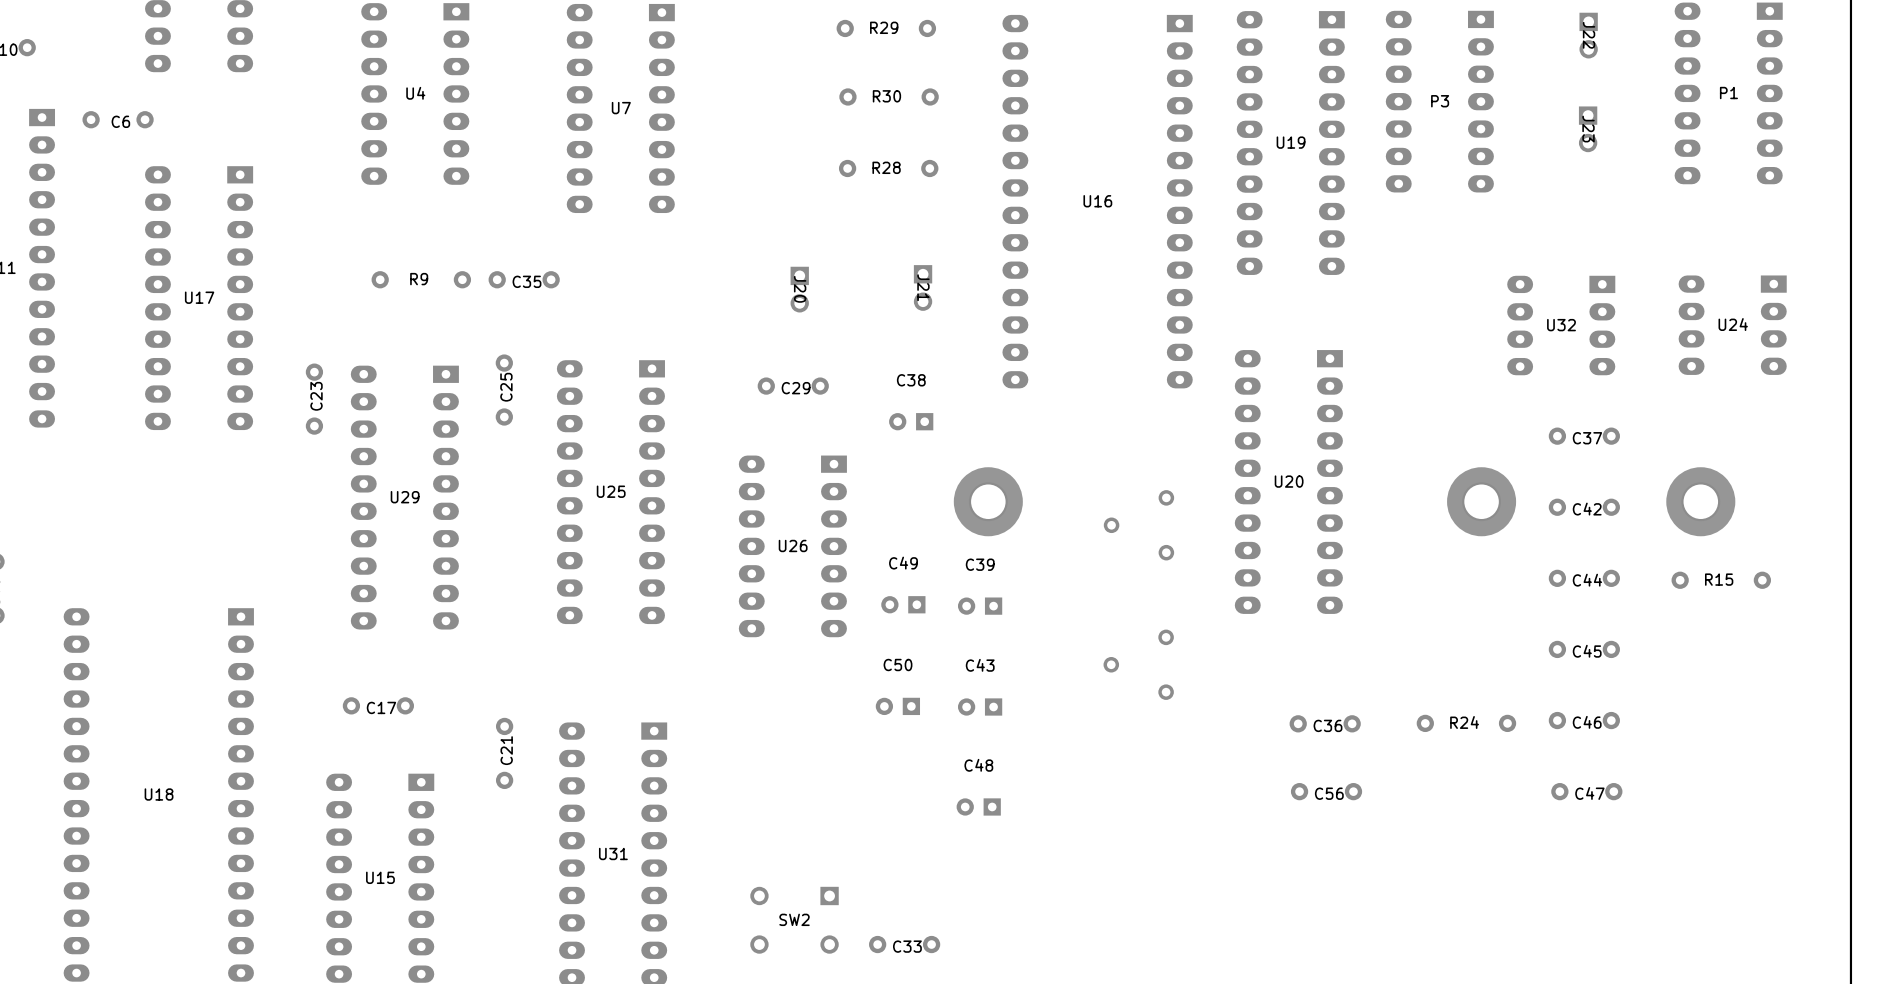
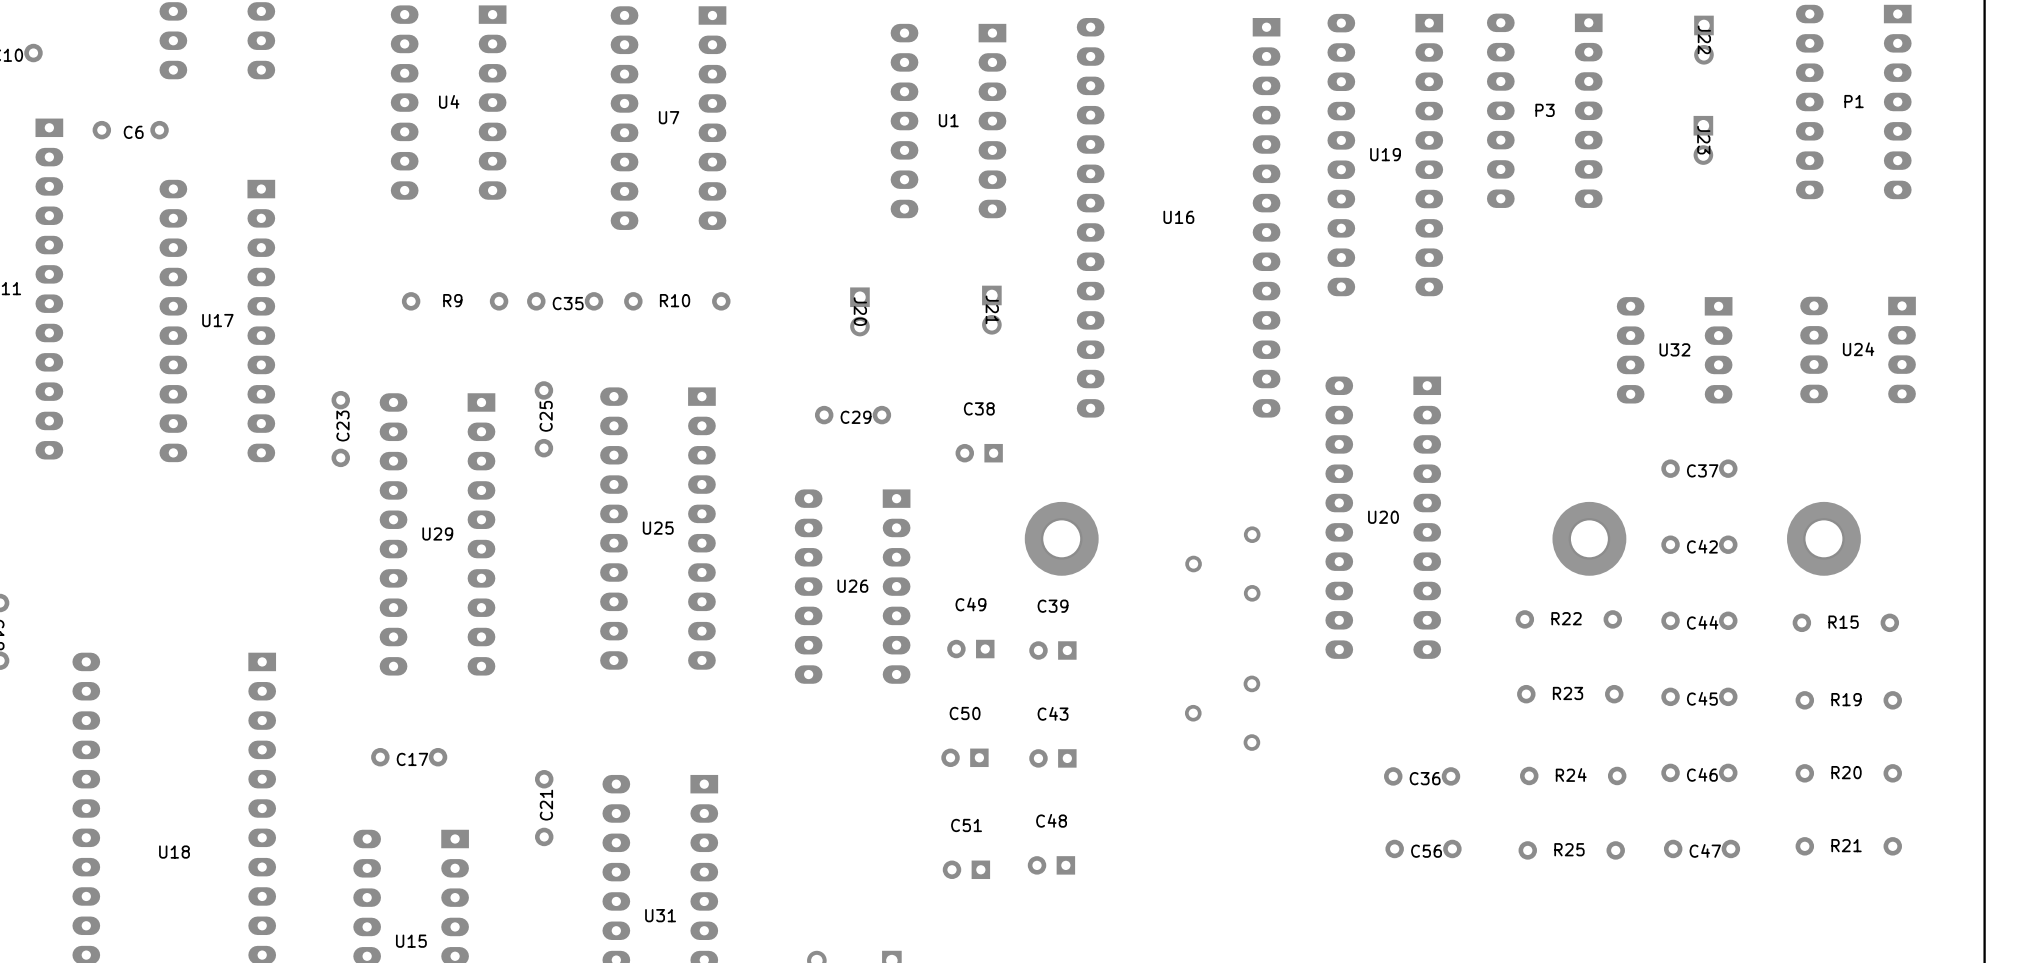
R29: (886, 28) -> none
R30: (889, 96) -> none
U1: none -> (948, 121)
R28: (888, 168) -> none
R10: none -> (677, 301)
R22: none -> (1568, 619)
R23: none -> (1570, 694)
R19: none -> (1848, 700)
R20: none -> (1848, 773)
R21: none -> (1848, 846)
R25: none -> (1571, 850)
C51: none -> (966, 869)

